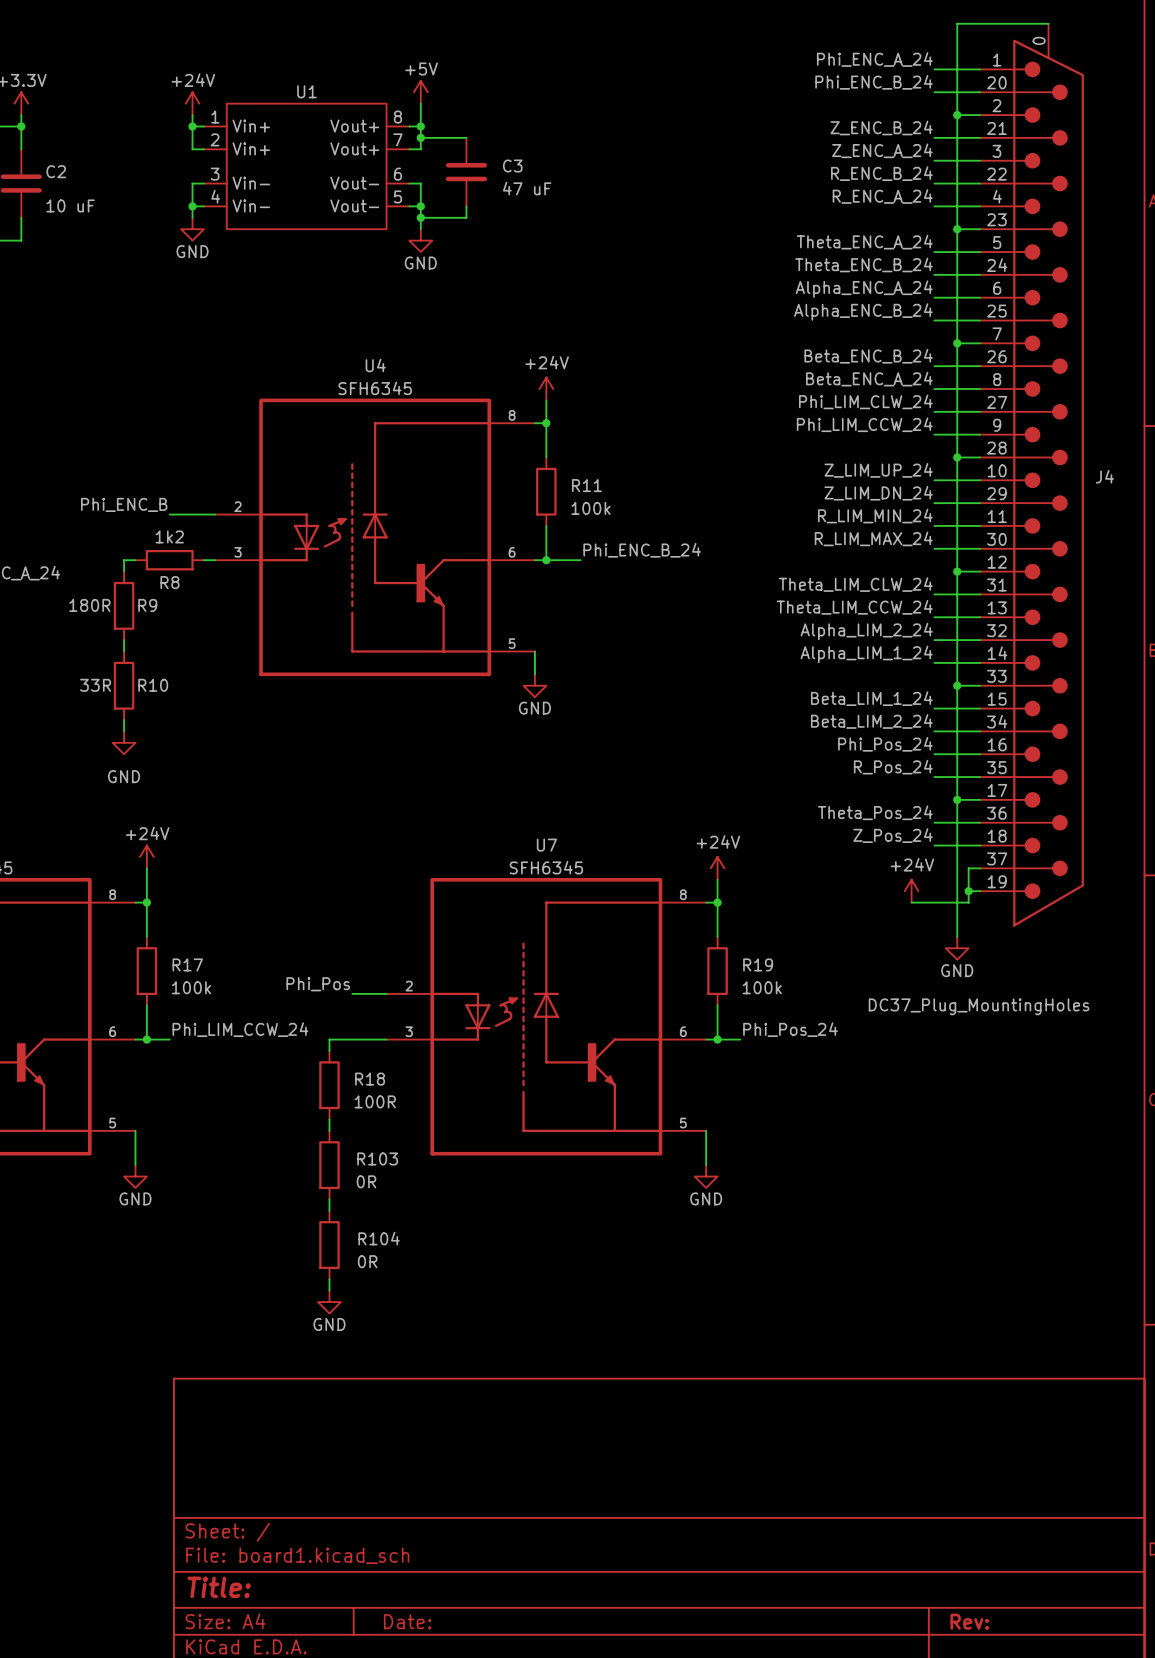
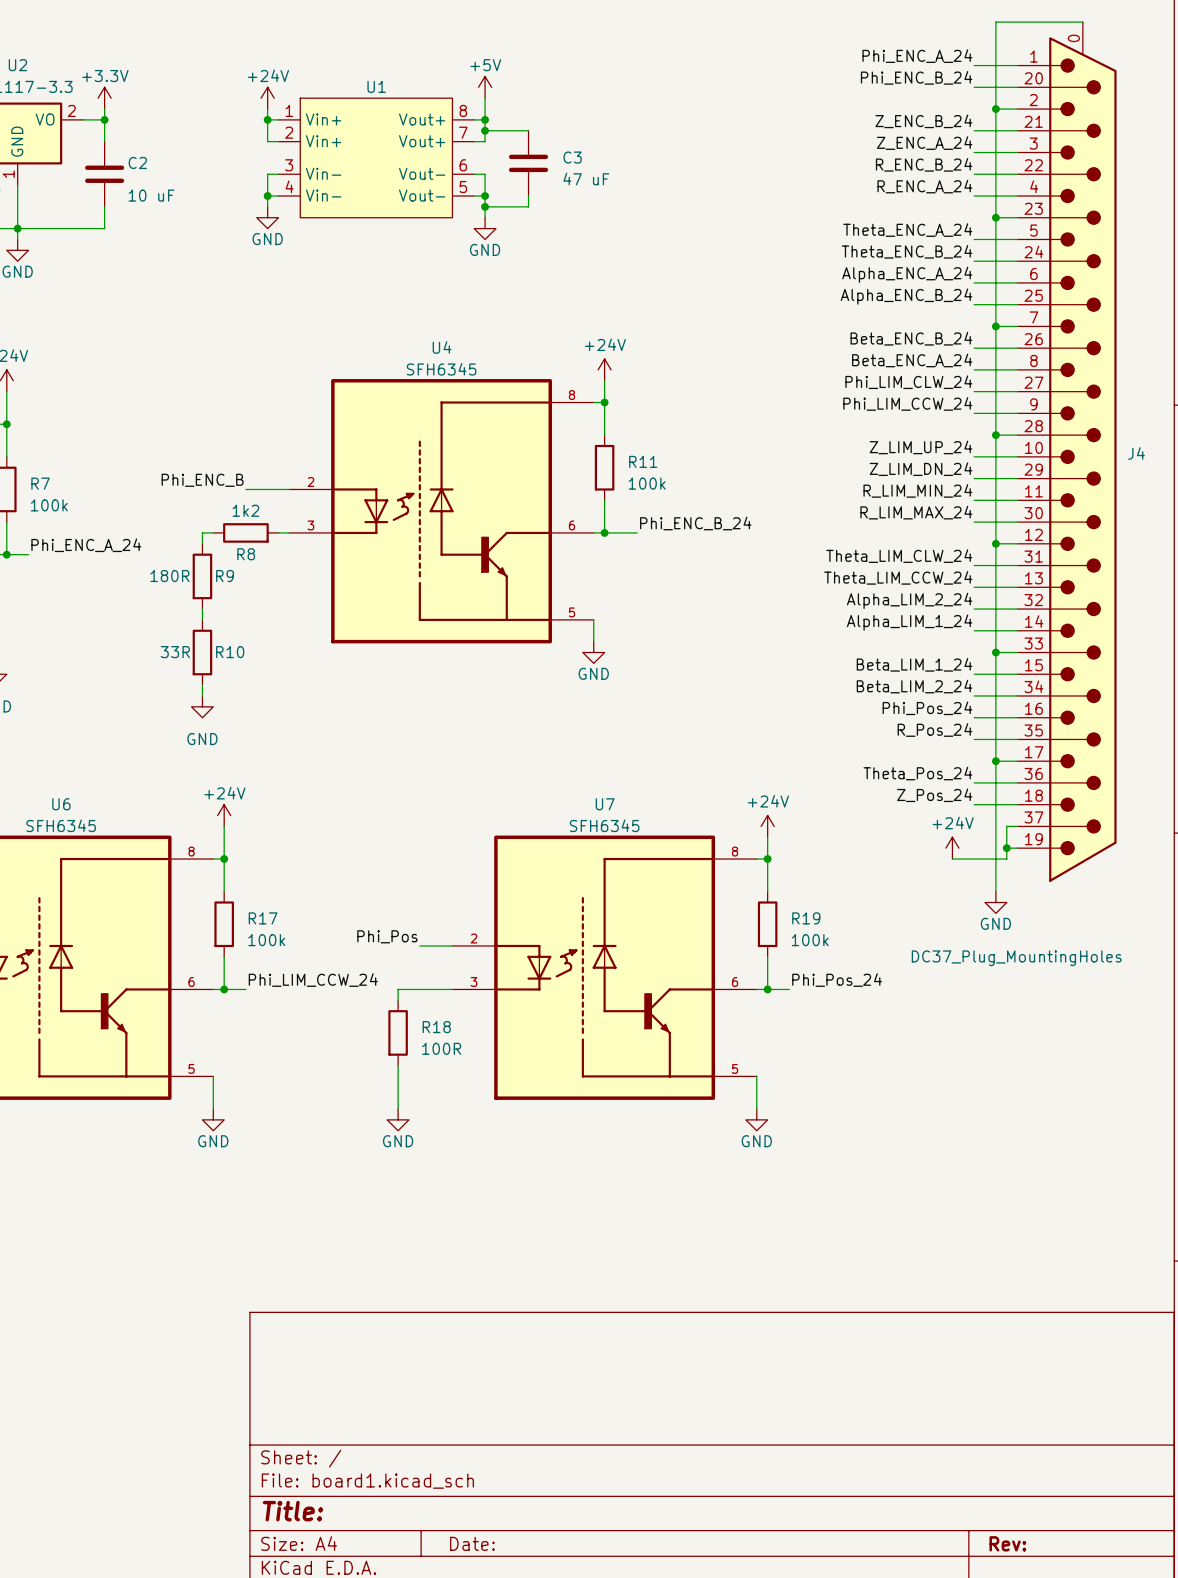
wire: none -> (398, 1076) (398, 1109)
R103: 0R (329, 1165) -> none
wire: (329, 1199) (329, 1210) -> none
R104: 0R (329, 1245) -> none
wire: (329, 1279) (329, 1290) -> none
power symbol position: GND (329, 1302) -> GND (398, 1119)

